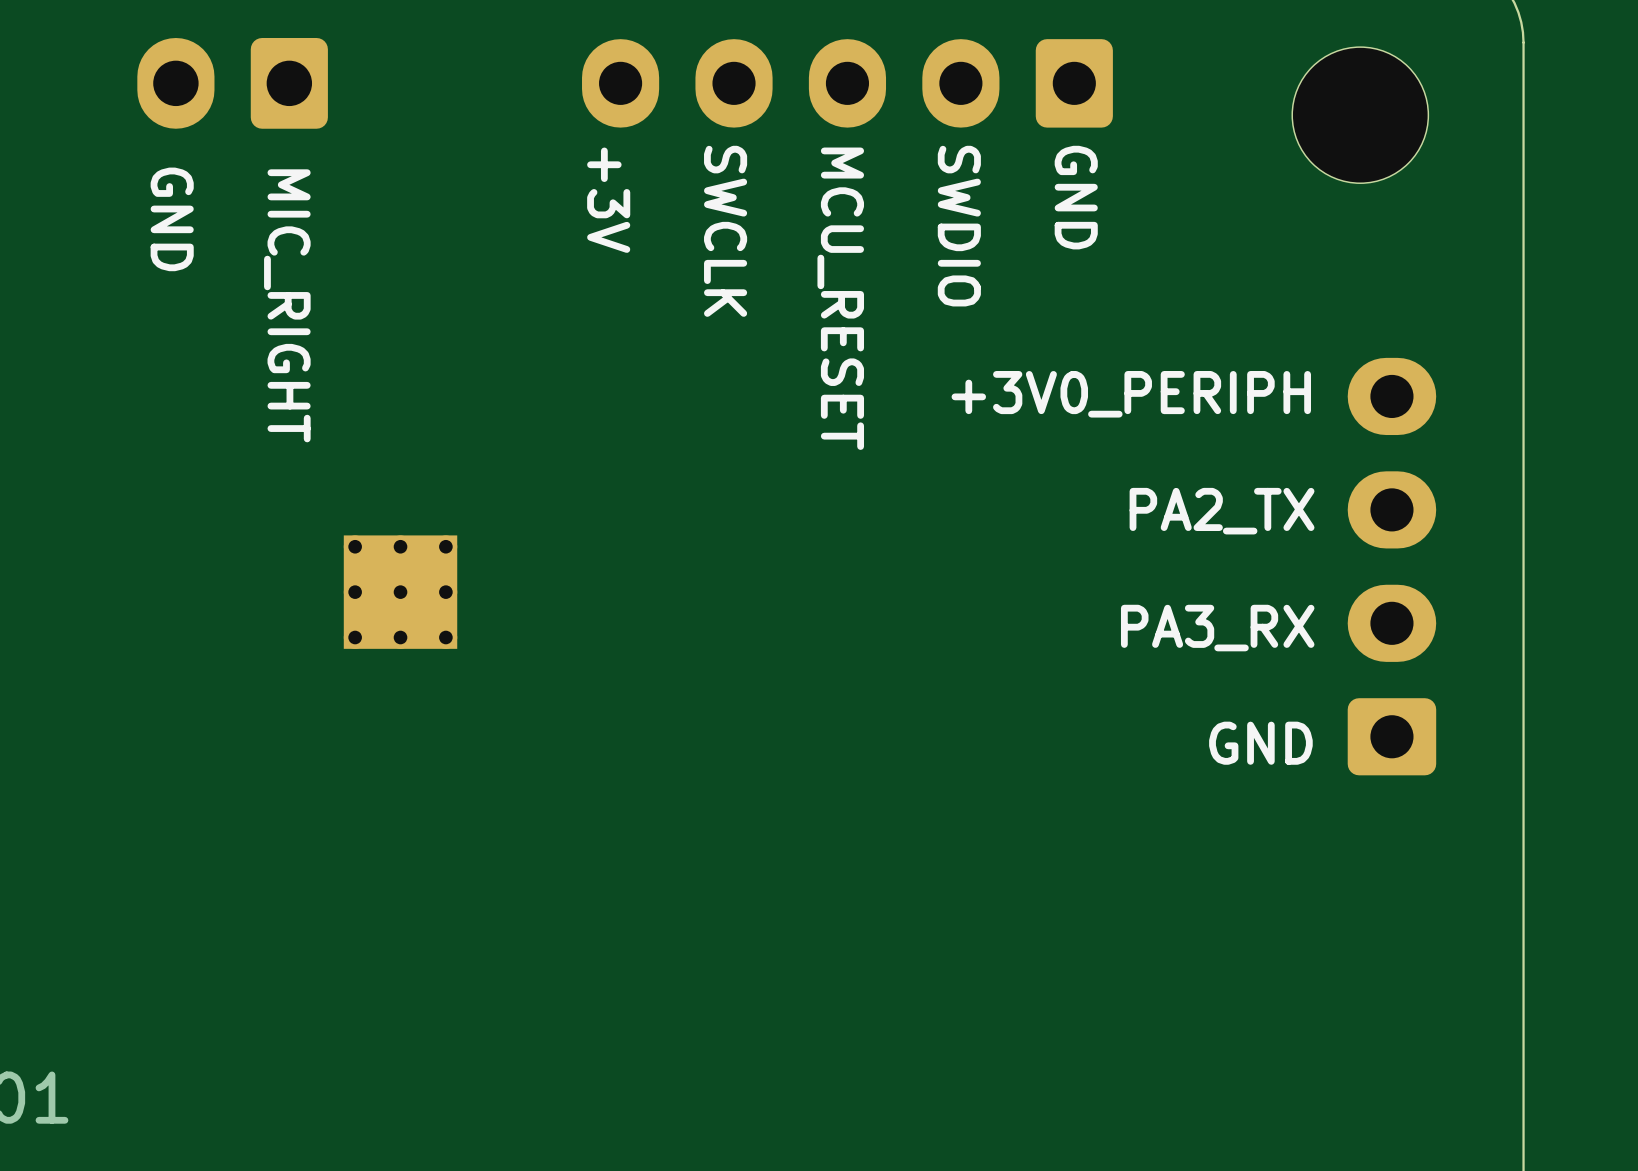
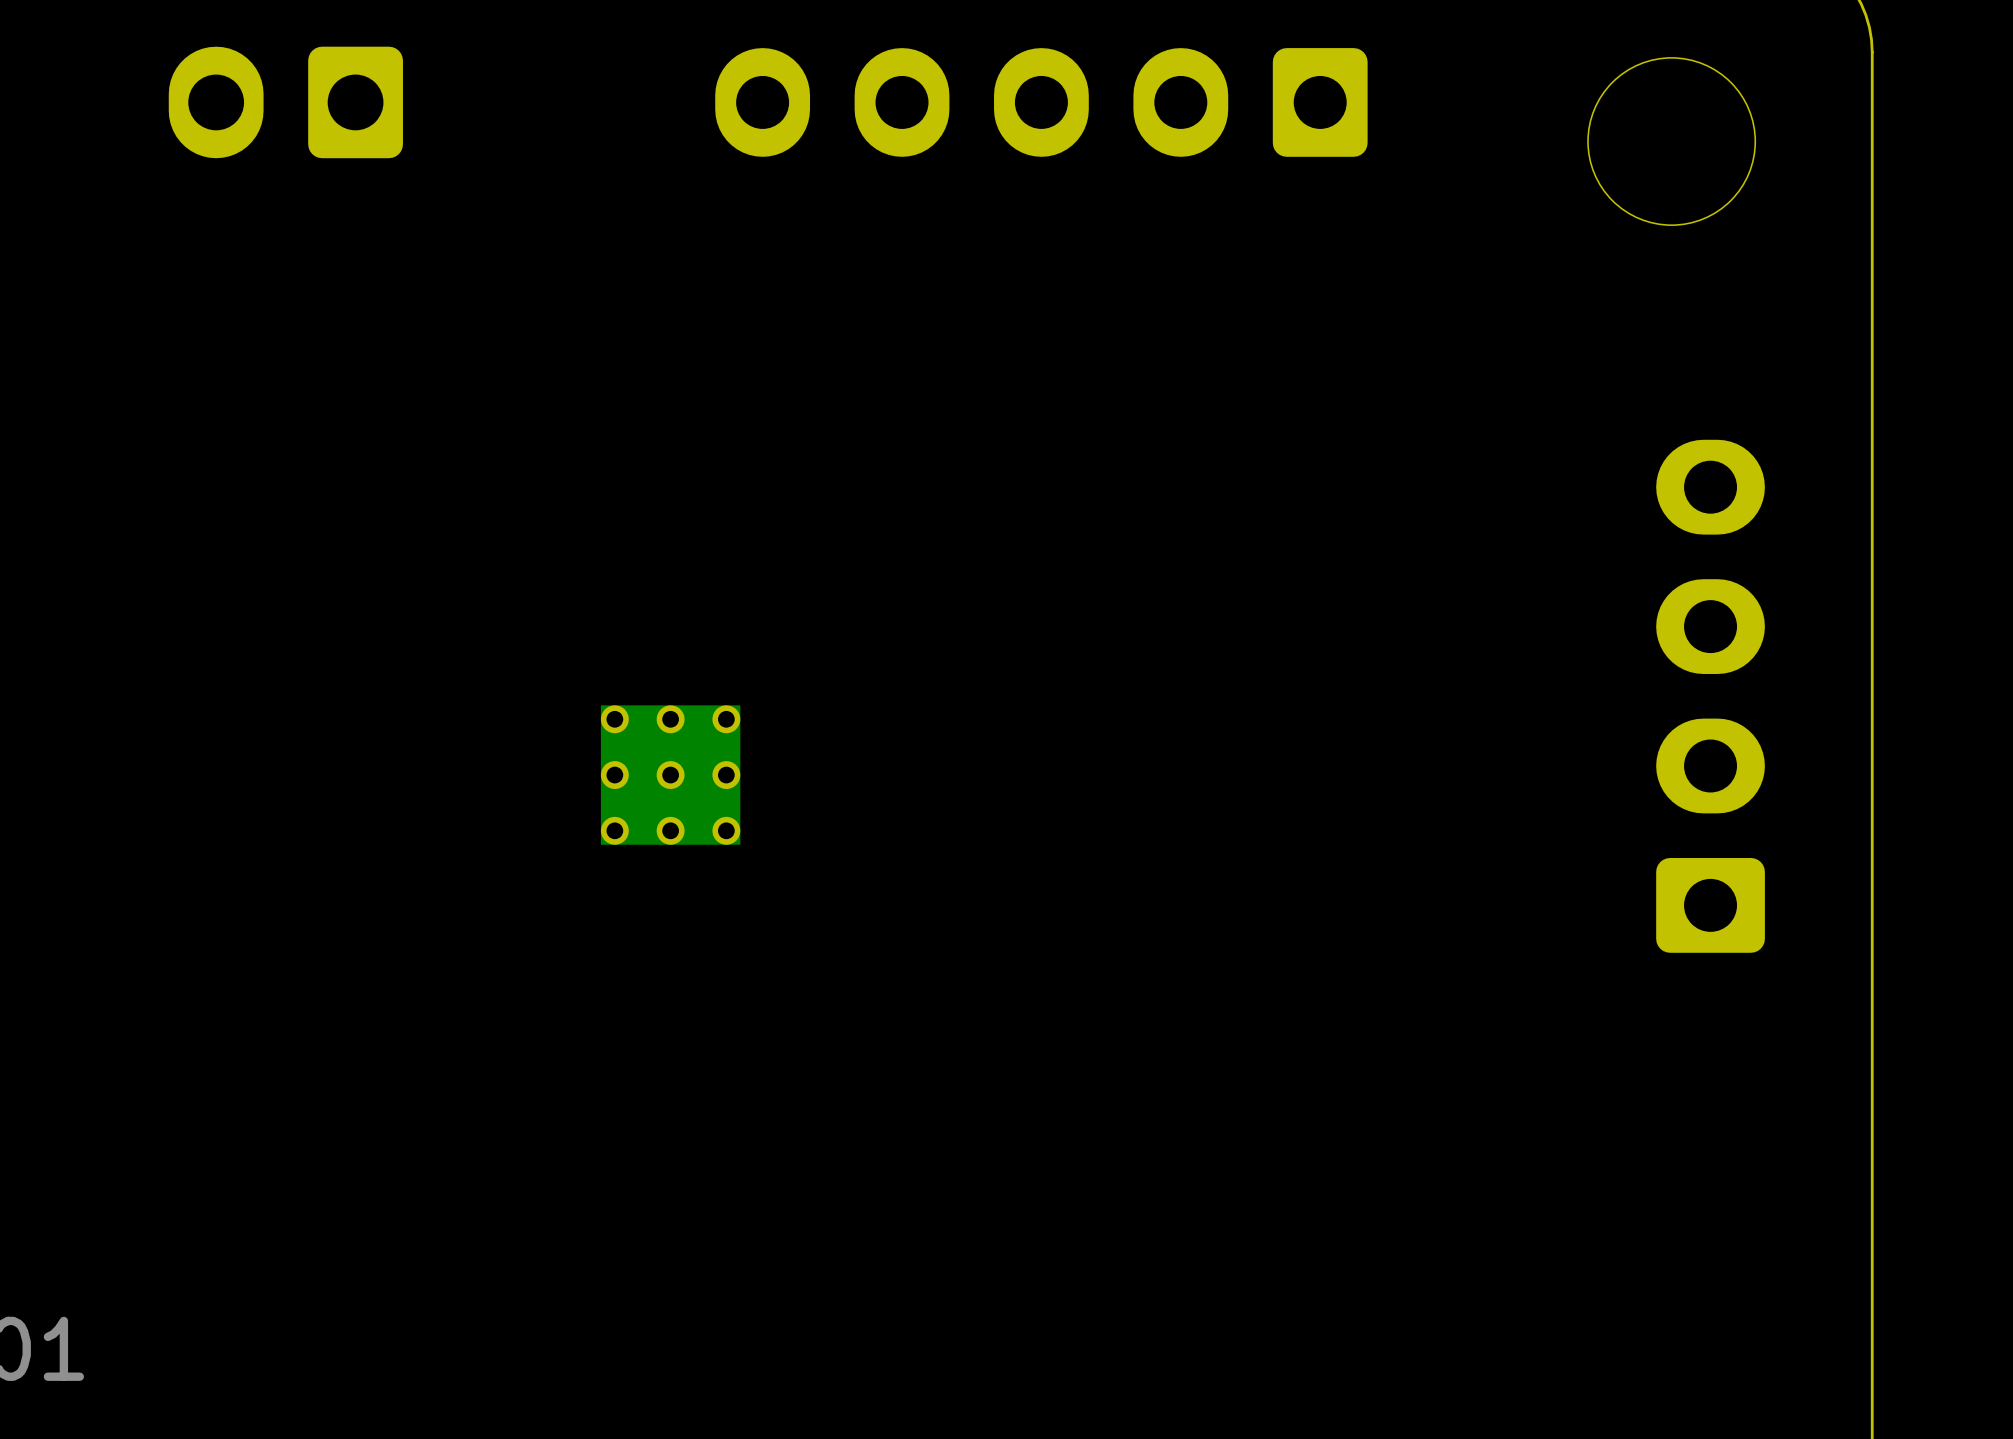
text: GND (1076, 197) -> none
text: +3V (608, 200) -> none
text: GND (172, 219) -> none
text: SWDIO (959, 226) -> none
text: SWCLK (725, 231) -> none
text: MCU_RESET (840, 298) -> none
text: MIC_RIGHT (287, 305) -> none
text: +3V0_PERIPH (1131, 394) -> none
text: PA2_TX (1222, 511) -> none
part position: (400, 592) -> (670, 775)
text: PA3_RX (1217, 628) -> none
text: GND (1260, 743) -> none

